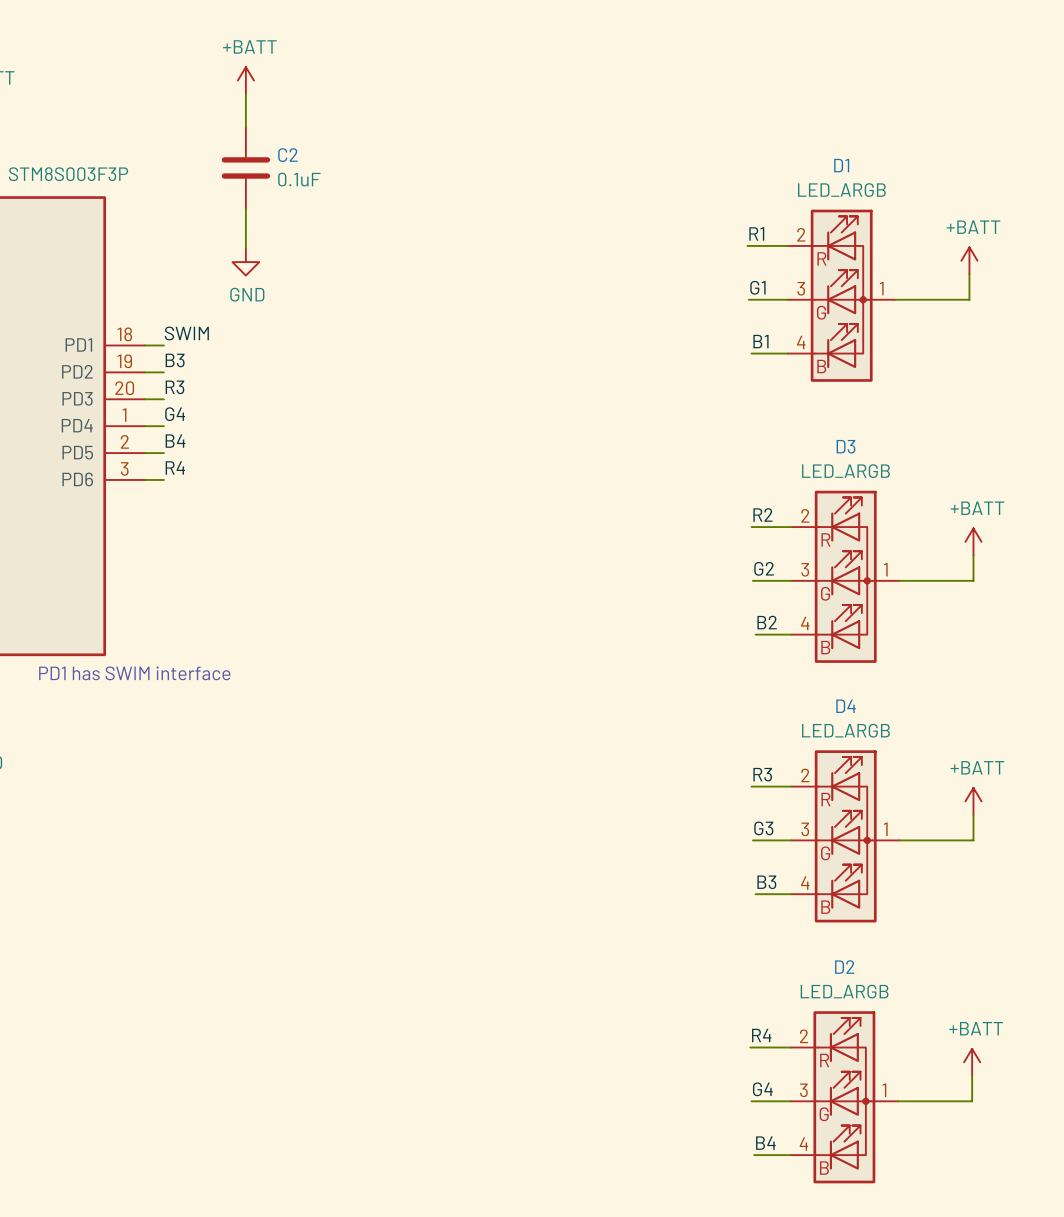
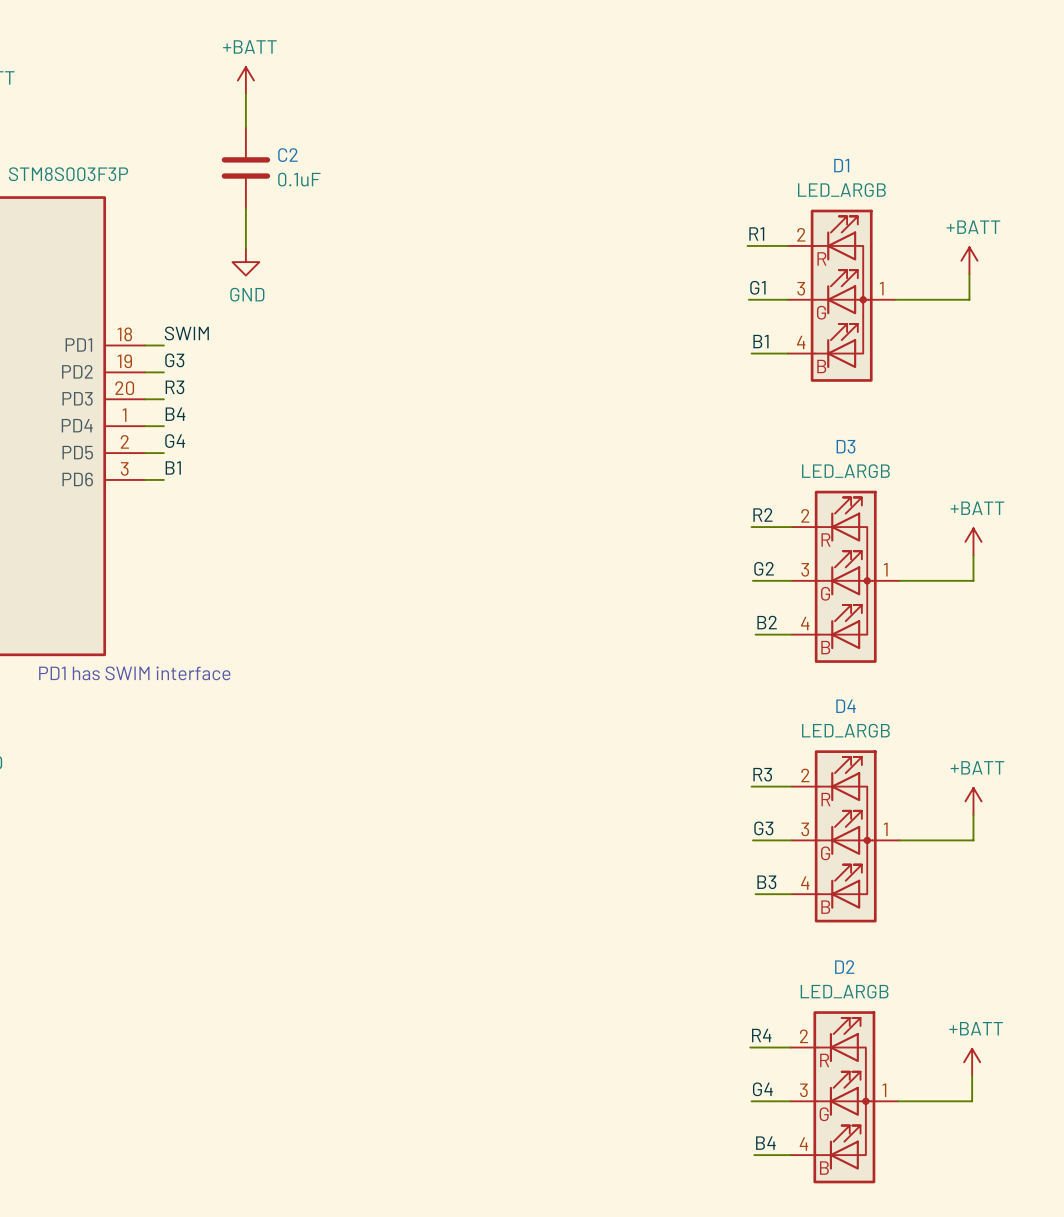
label: B3 (175, 360) -> G3 (174, 360)
label: G4 (175, 414) -> B4 (175, 414)
label: B4 (175, 441) -> G4 (175, 441)
label: R4 (175, 467) -> B1 (173, 467)

